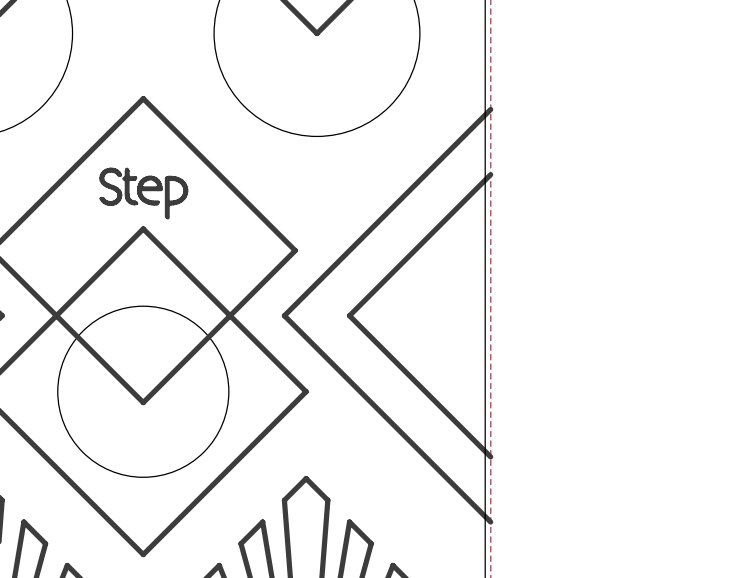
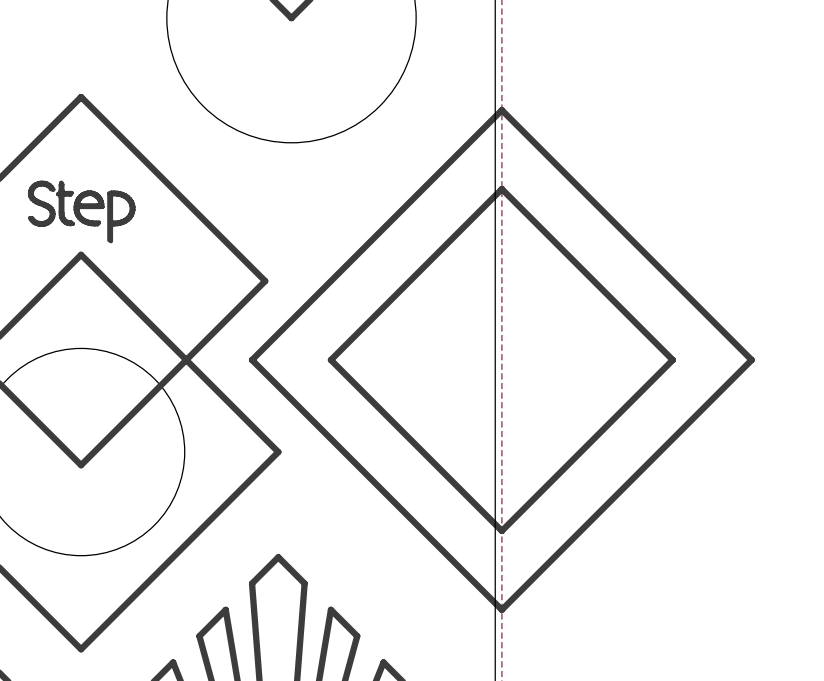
line: none -> (501, 110) (751, 360) (501, 609)
line: none -> (501, 189) (672, 360) (501, 530)

